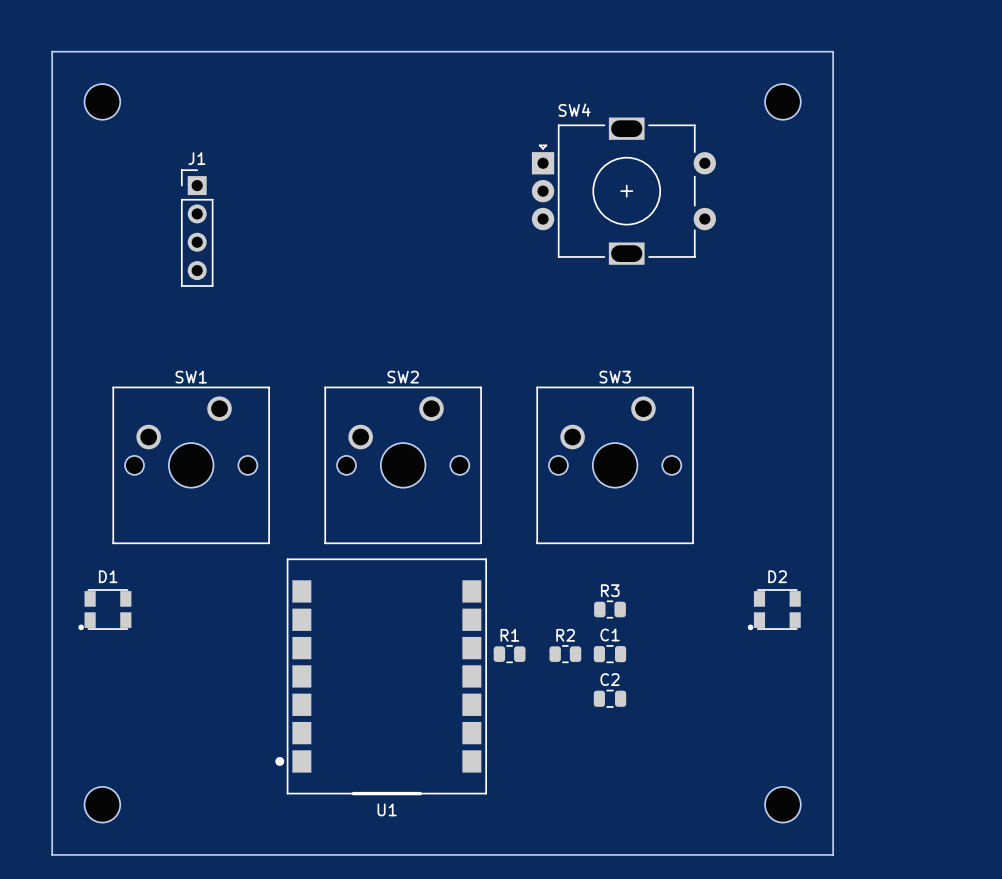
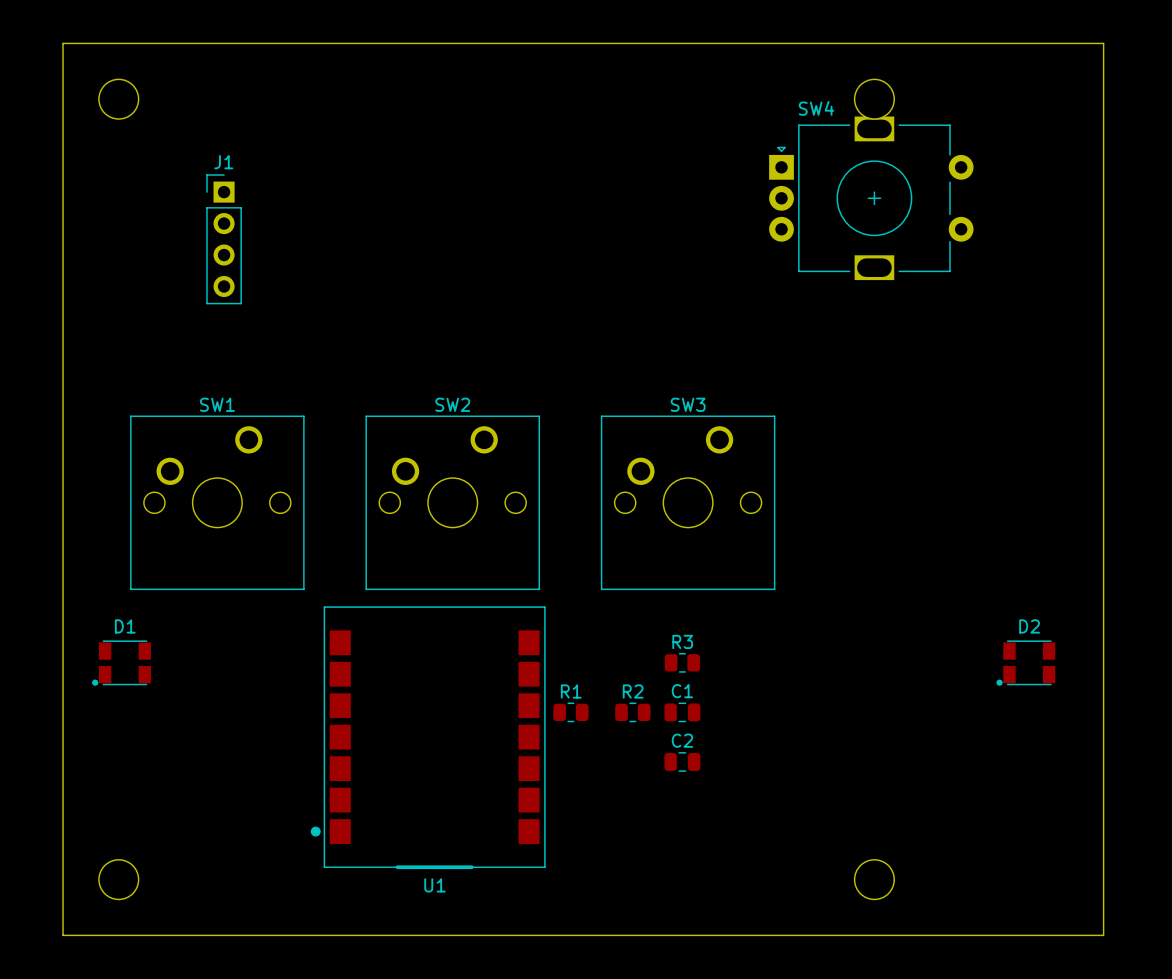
board edge: (833, 51) (833, 854) -> (930, 43) (1103, 43) (1103, 935) (930, 935)
SW4 position: (623, 191) -> (871, 198)
D2 position: (774, 609) -> (1025, 663)

